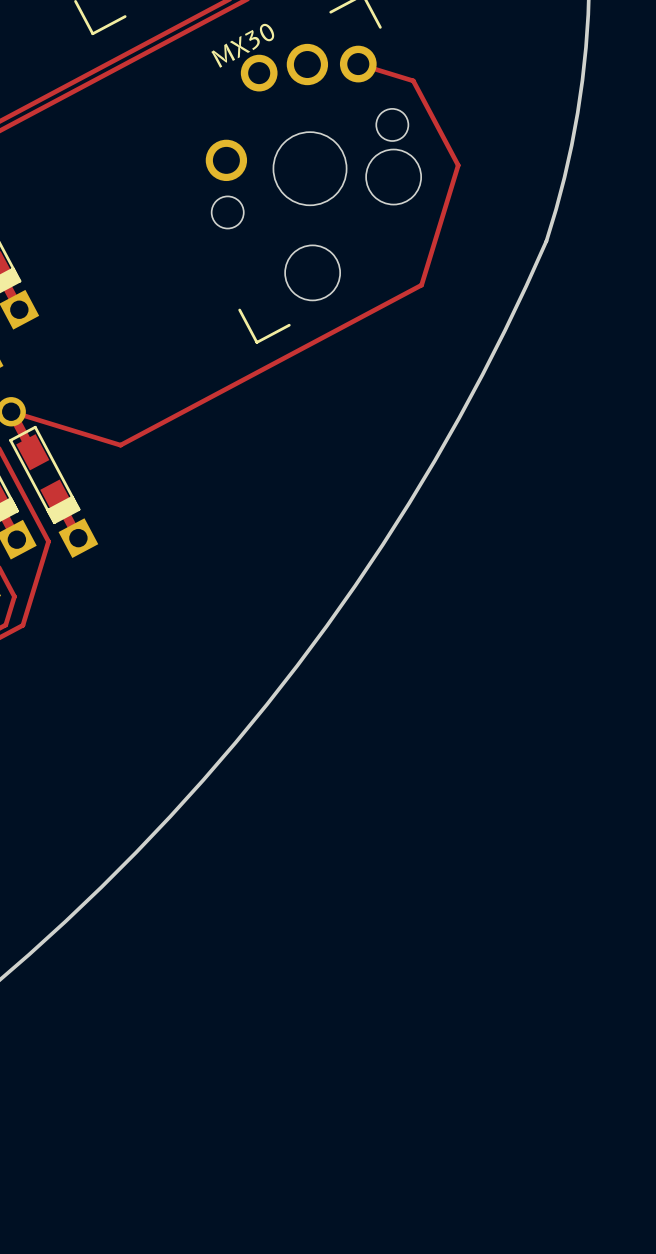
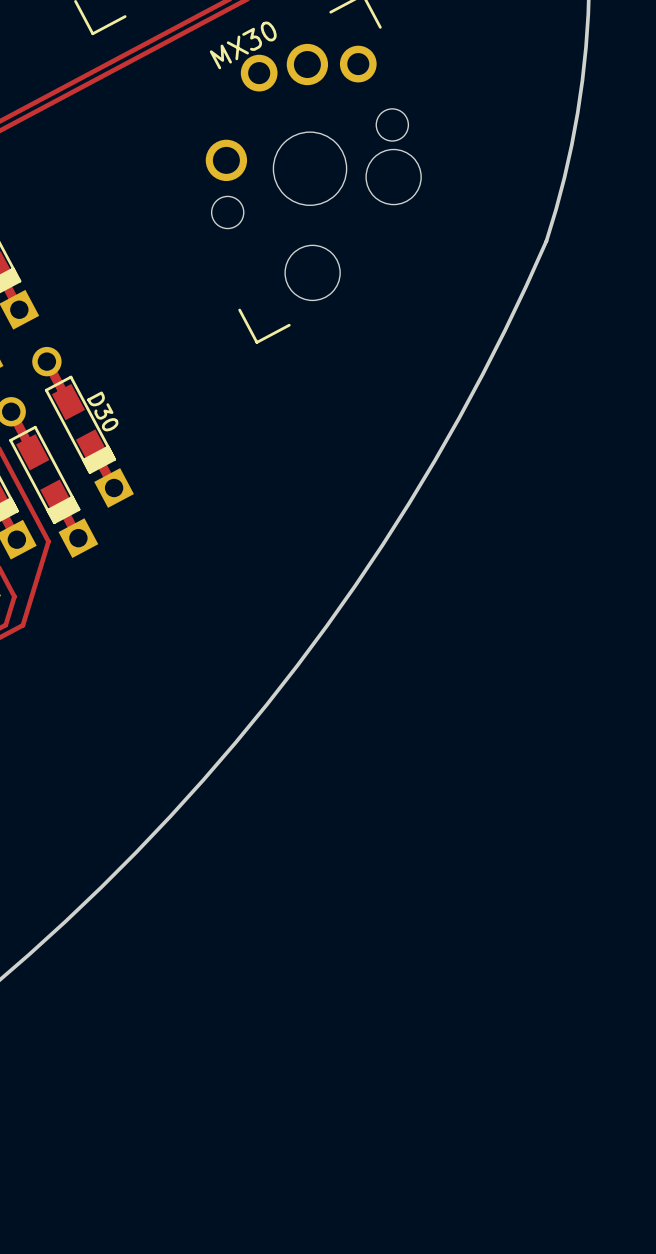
track: (358, 64) (413, 80) (458, 165) (421, 285) (120, 445) (11, 411) -> none
D30: none -> (83, 427)

